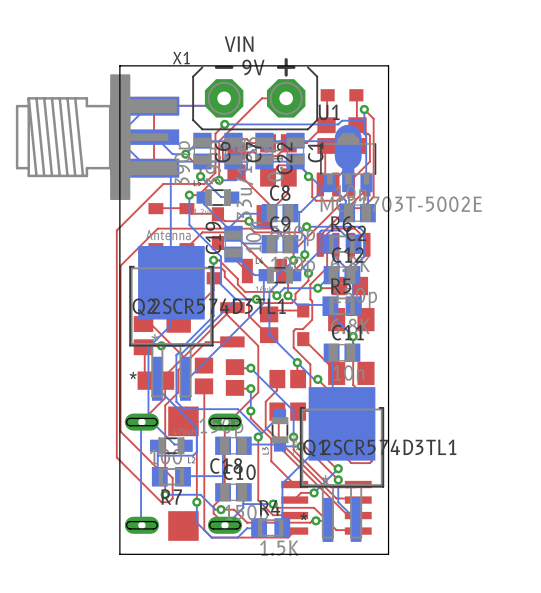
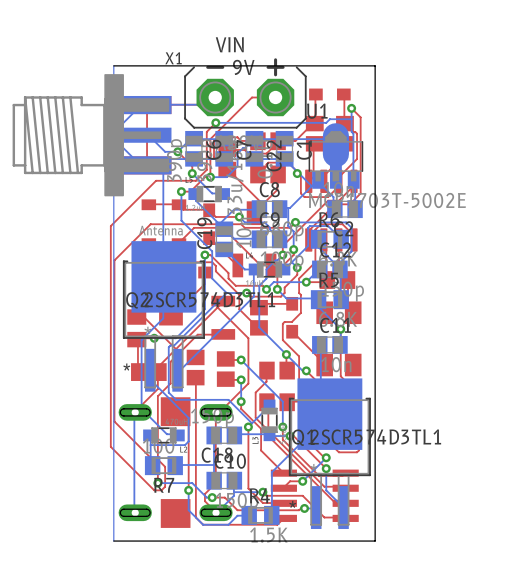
board edge: (119, 65) (119, 554) -> none
bottom track: none -> (113, 65) (113, 541)

